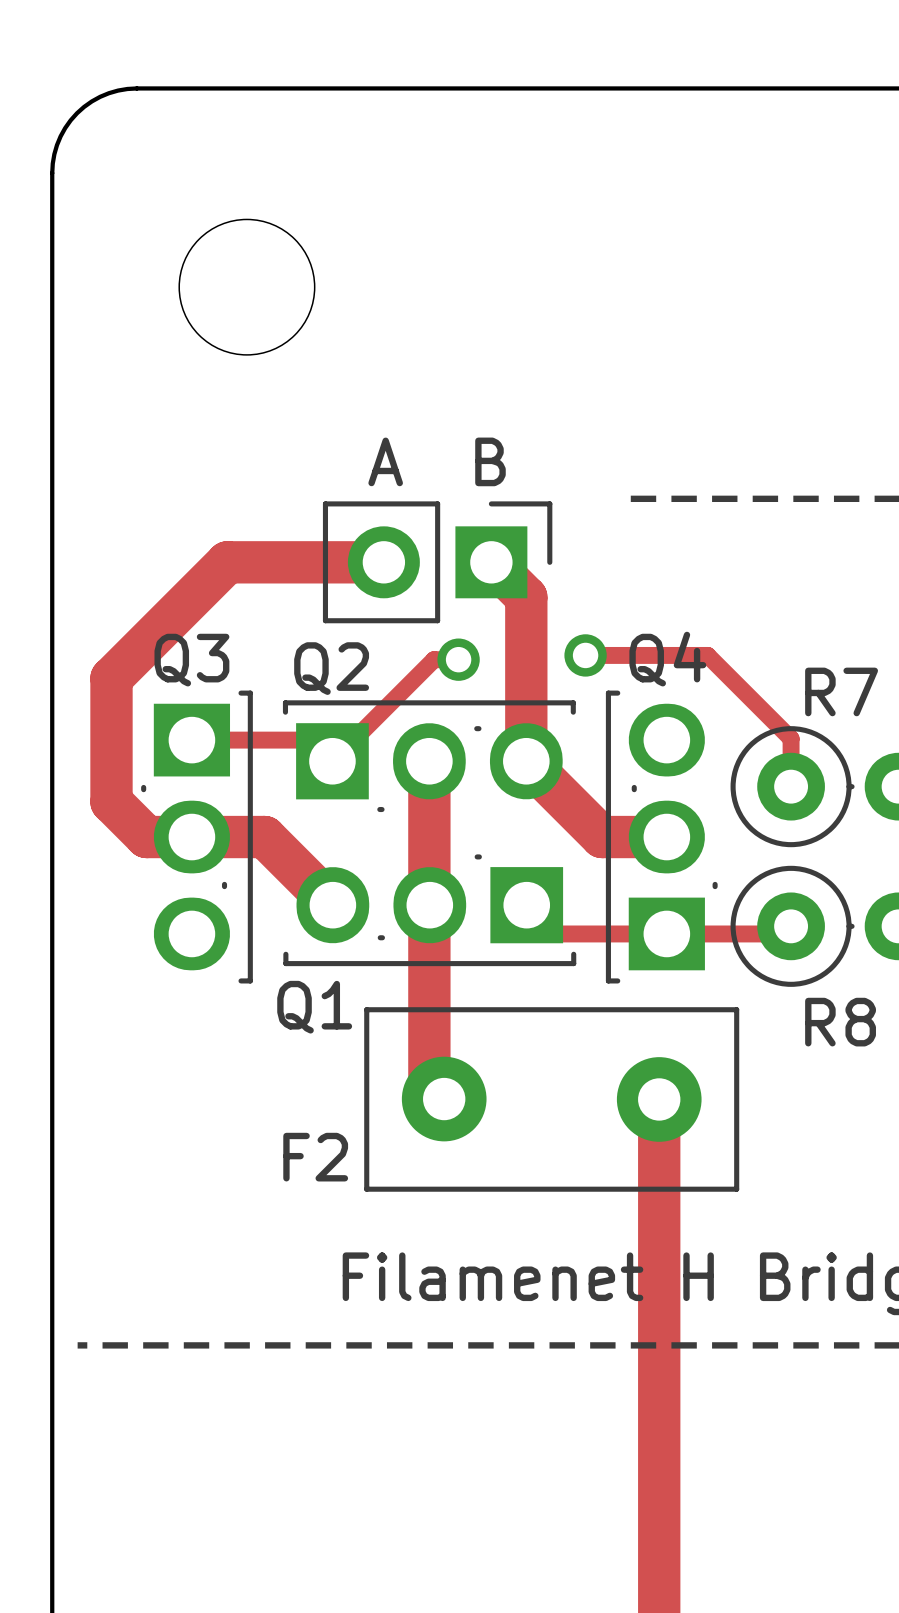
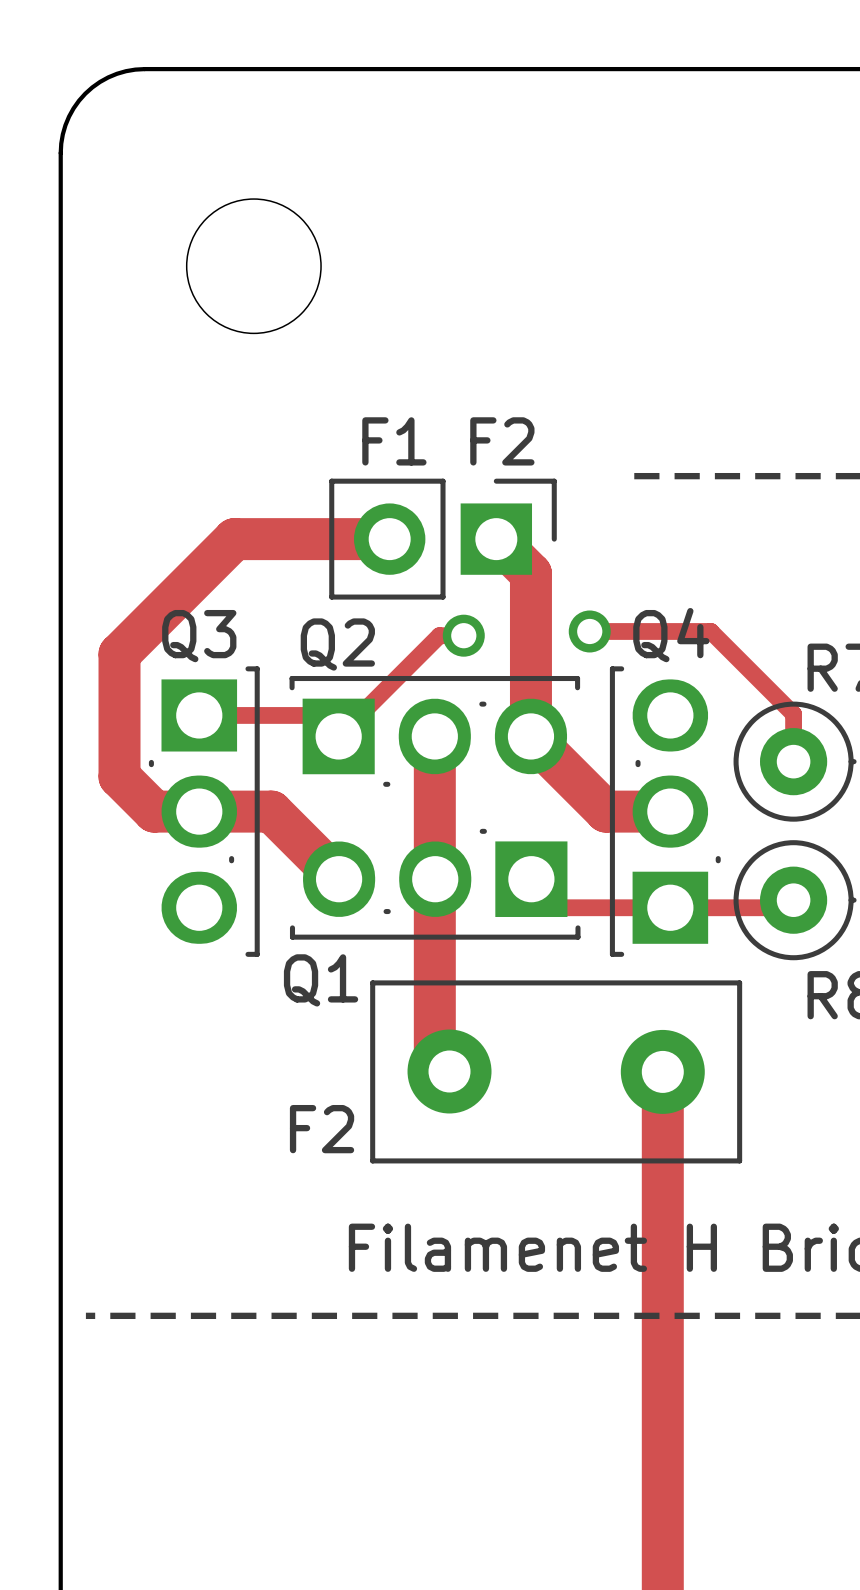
text: A B (437, 461) -> F1 F2 (448, 441)

